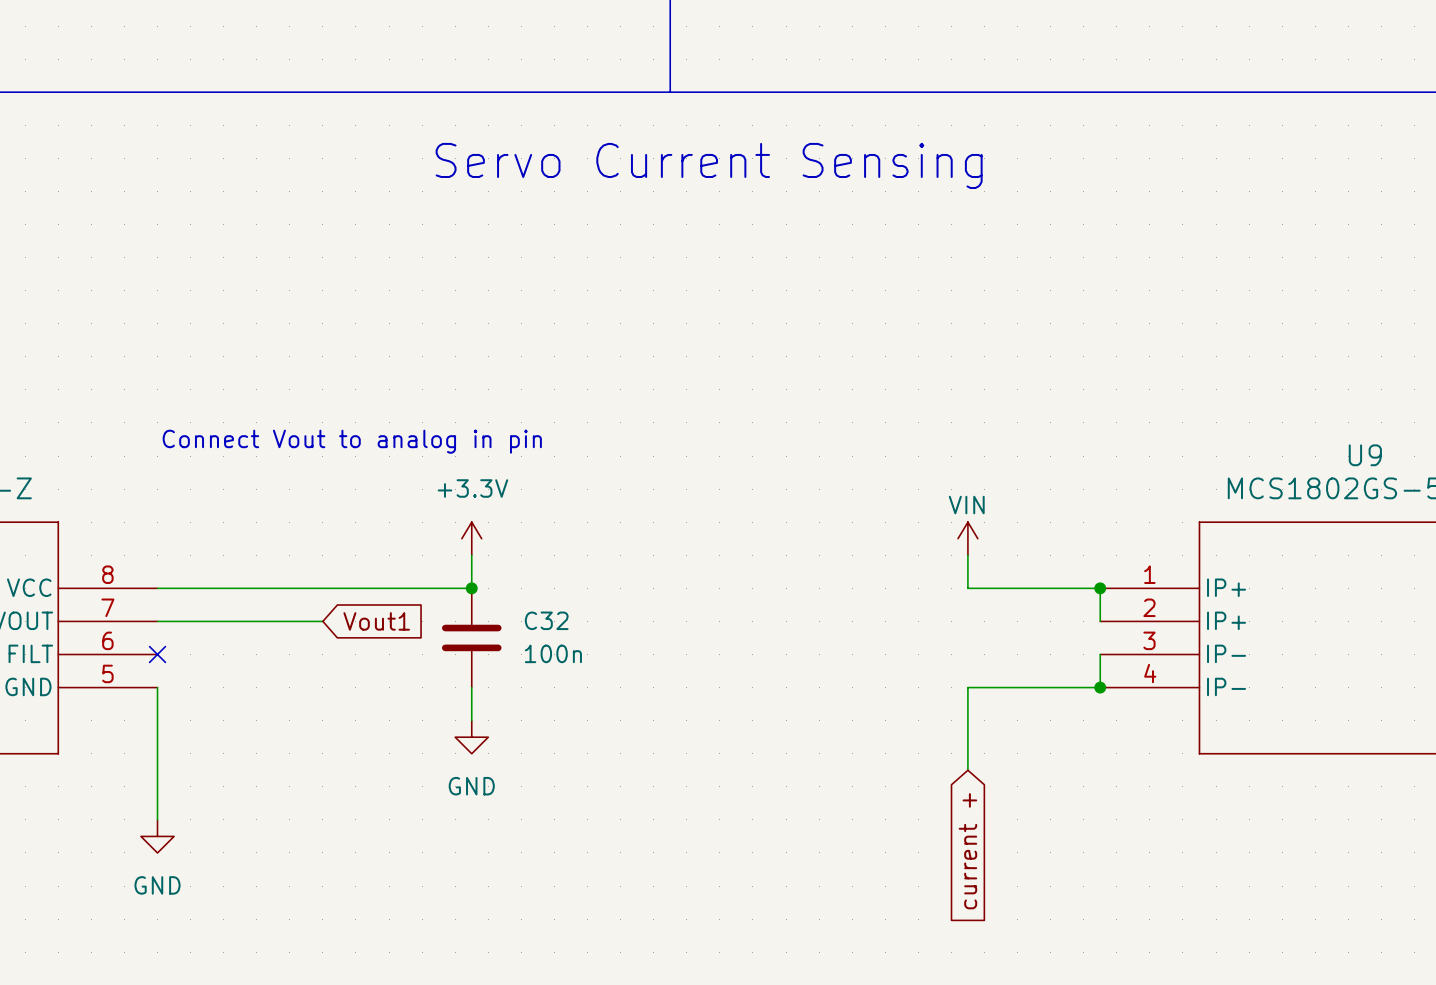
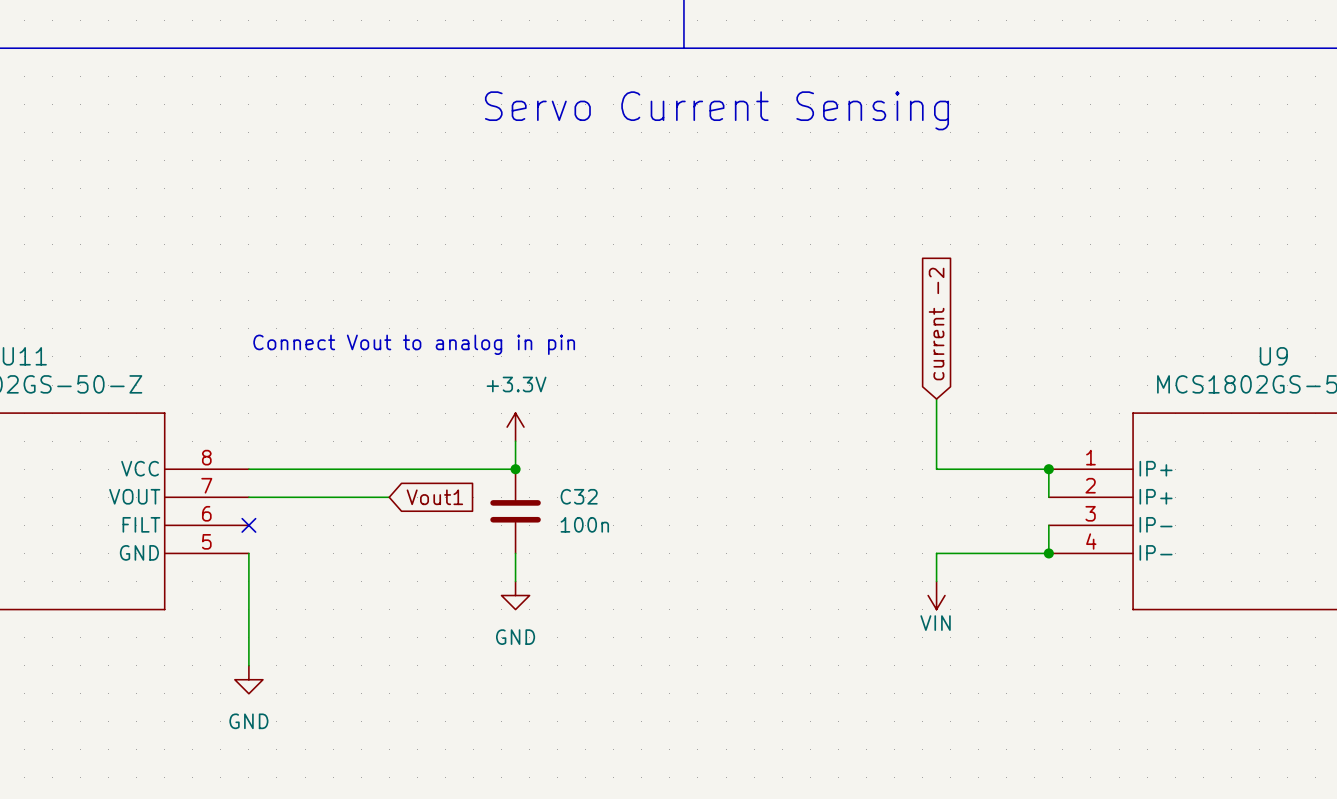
global label: none -> current -2 (936, 324)
power symbol rotation: 0° (967, 538) -> 180° (936, 595)
power symbol position: VIN (967, 538) -> VIN (936, 595)
global label: current + (967, 851) -> none

